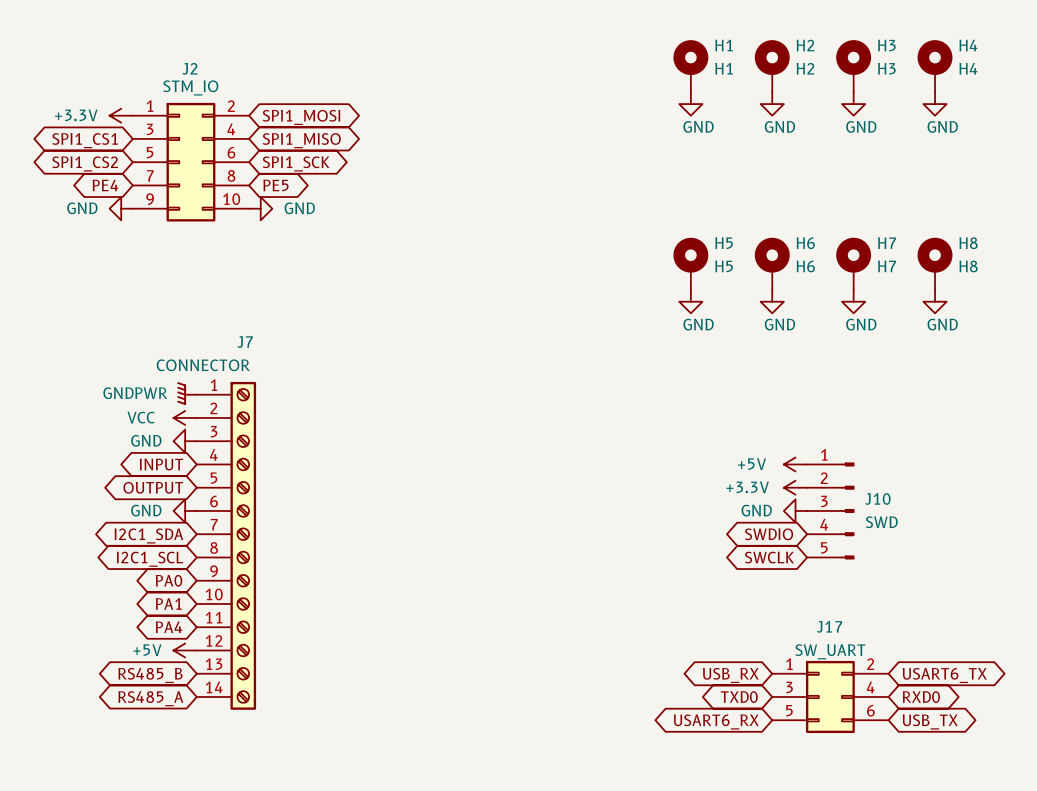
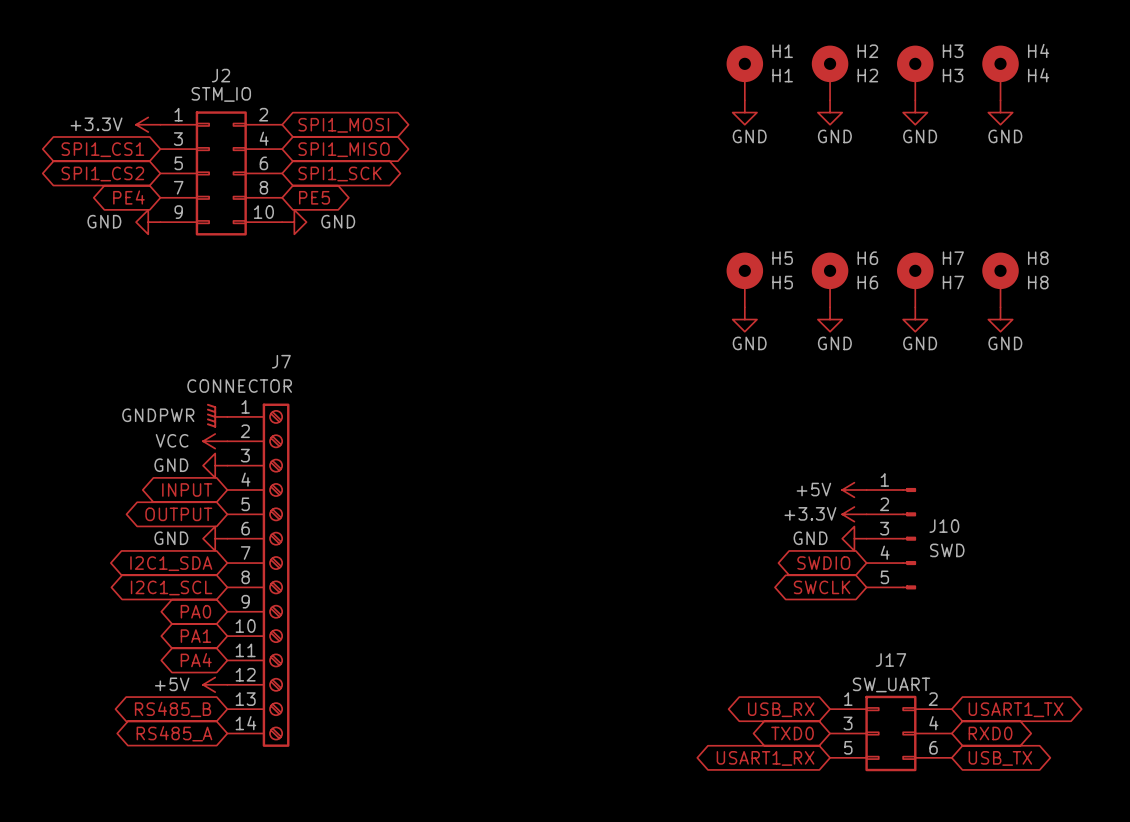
global label: USART6_TX (944, 675) -> USART1_TX (1016, 709)
global label: USART6_RX (716, 721) -> USART1_RX (765, 758)

